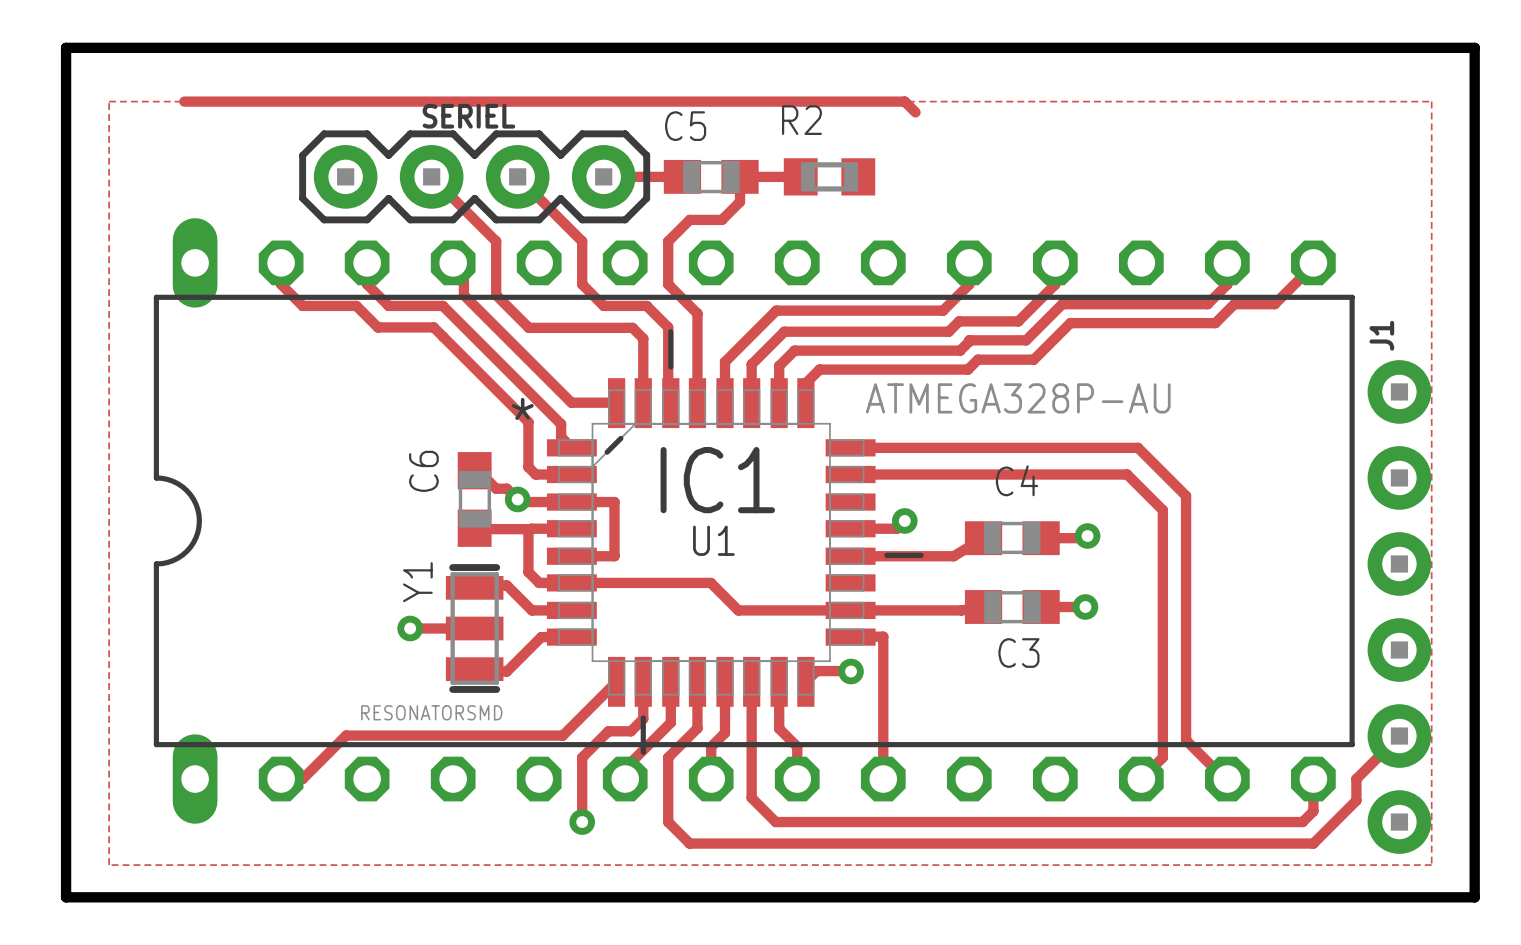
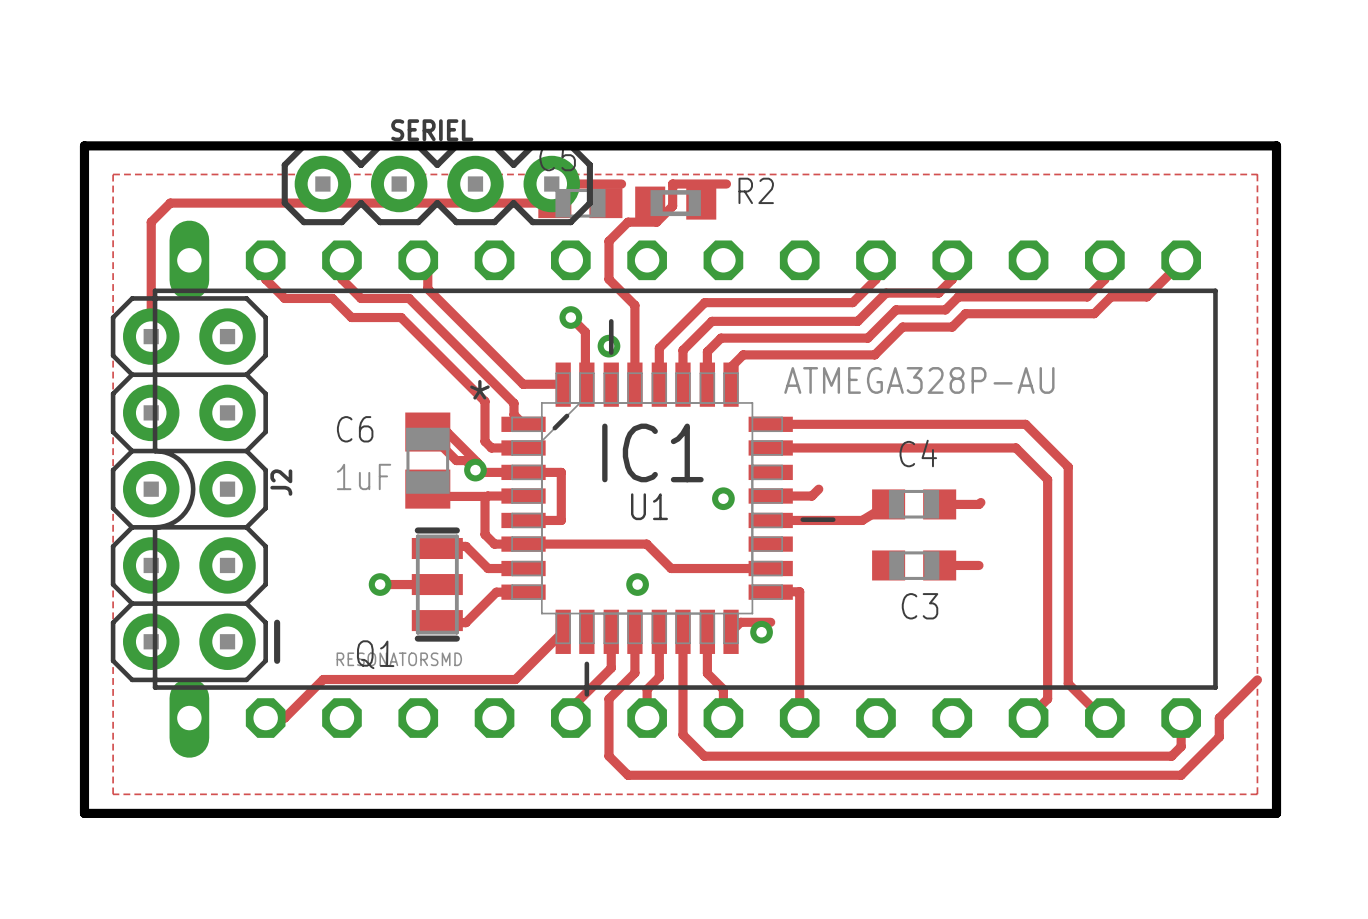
board edge: (66, 47) (1474, 47) (1474, 897) (66, 897) (66, 47) -> (84, 145) (84, 813) (1276, 813) (1276, 145) (84, 145)
track: (184, 101) (904, 101) (915, 112) -> none
R2 name position: R2 (801, 120) -> R2 (756, 190)
zone outline: (109, 166) (109, 101) (1431, 101) (1431, 865) (1399, 865) -> (113, 174) (1257, 174) (1257, 794)
track: (431, 176) (496, 241) (496, 295) (528, 327) (632, 327) (643, 338) (643, 383) -> (570, 317) (585, 332) (586, 366)
track: (517, 176) (582, 241) (582, 284) (603, 305) (646, 305) (668, 327) (668, 400) -> none
C5 position: (711, 176) -> (580, 203)
R2 position: (829, 176) -> (675, 203)
track: none -> (554, 203) (170, 203) (151, 222) (151, 336)
track: (1039, 299) (1018, 321) (959, 321) -> (938, 293) (885, 293) (866, 312)
track: (1047, 318) (1026, 340) (969, 341) -> (945, 309) (896, 309) (875, 330)
via: none -> (570, 317)
track: (1055, 338) (1033, 359) (977, 359) -> (952, 327) (902, 327) (883, 346)
via: none -> (608, 346)
C6 footprint: [457, 452, 492, 547] -> [405, 412, 451, 509]
track: none -> (430, 435) (427, 432) (446, 432) (477, 462) (477, 472)
C6 name rotation: 0° (423, 471) -> 90° clockwise (355, 429)
C6 value: none -> 1uF (364, 476)
J2: none -> (195, 489)
via: (904, 520) -> none
via: none -> (723, 498)
via: (1087, 536) -> none
Y1 name: Y1 (417, 582) -> Q1 (375, 654)
track: (983, 606) (961, 610) (850, 610) -> none
via: (1085, 606) -> none
J1: (1399, 606) -> none
via: none -> (637, 584)
via position: (851, 671) -> (761, 632)
track: (643, 681) (643, 718) (630, 731) (608, 731) (582, 757) (582, 822) -> none
via: (582, 822) -> none

